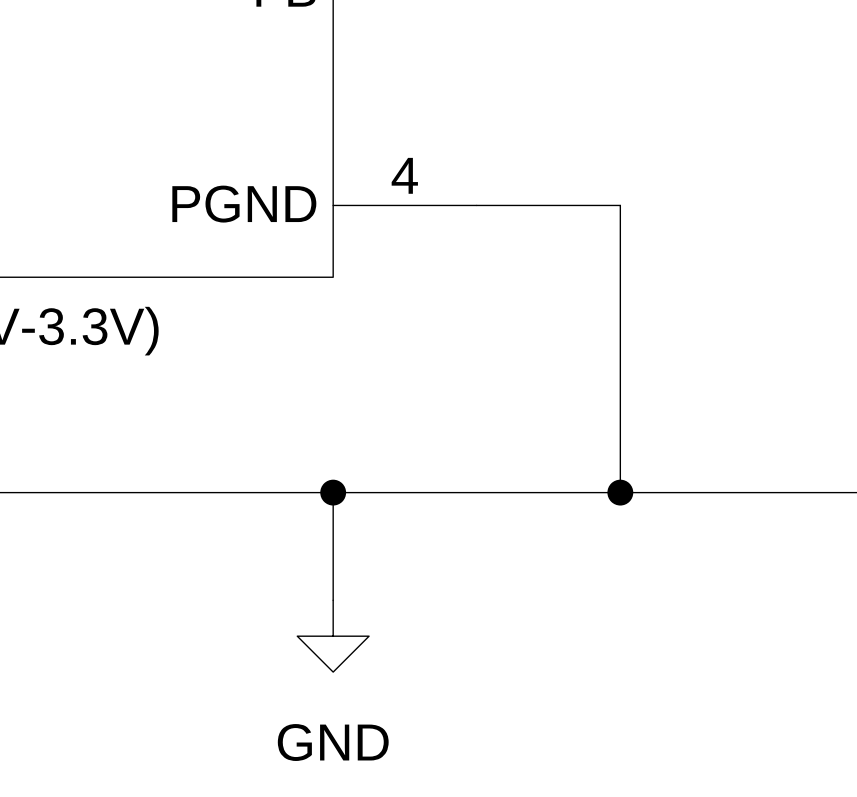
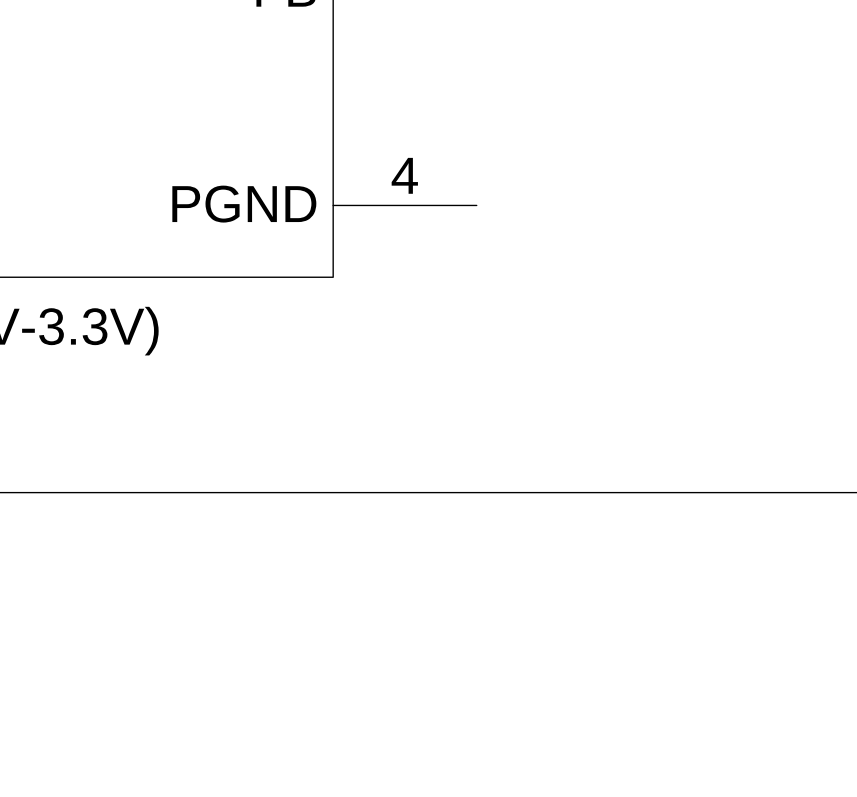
wire: (476, 205) (620, 205) (620, 492) -> none
wire: (333, 492) (333, 600) -> none
junction: (333, 492) -> none
junction: (620, 492) -> none
power symbol: GND (333, 636) -> none

